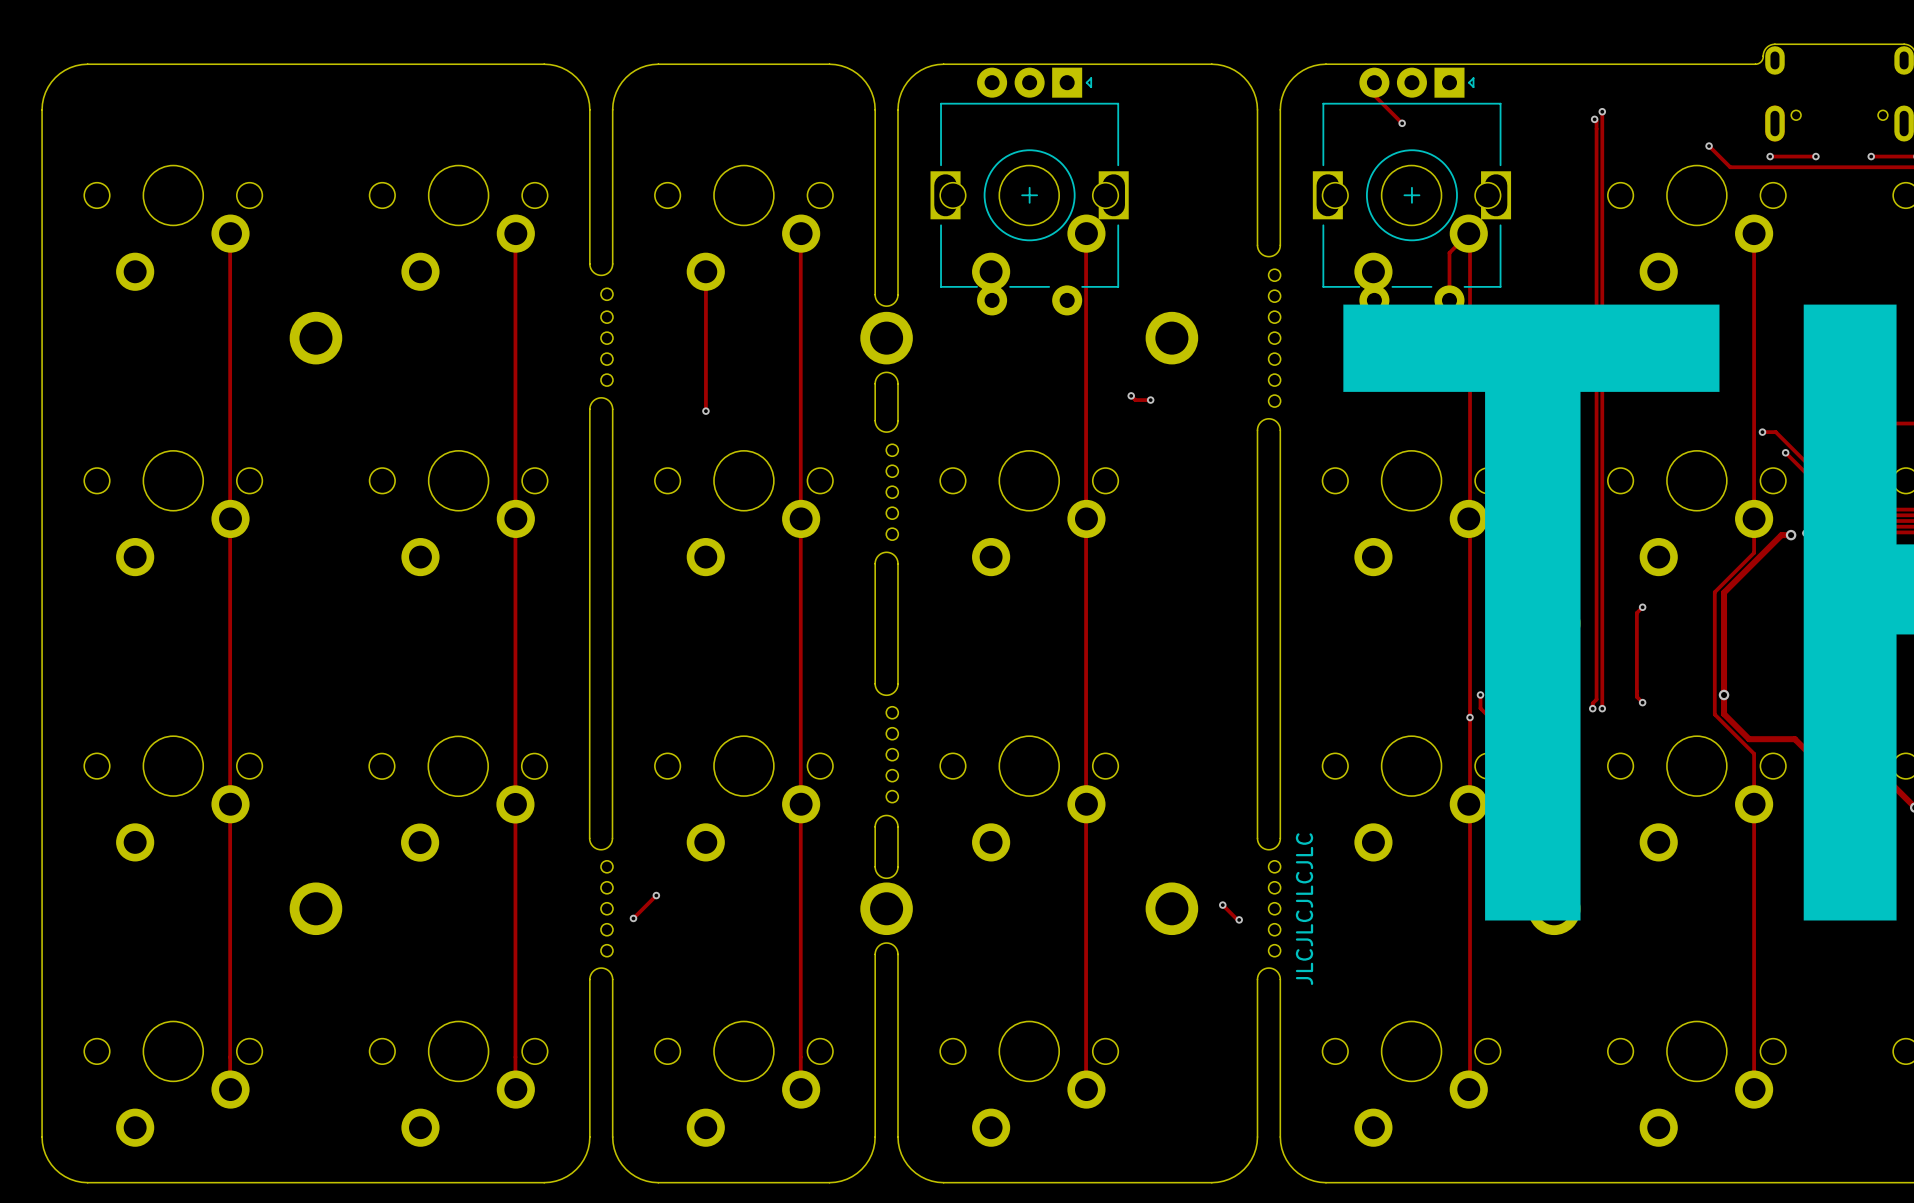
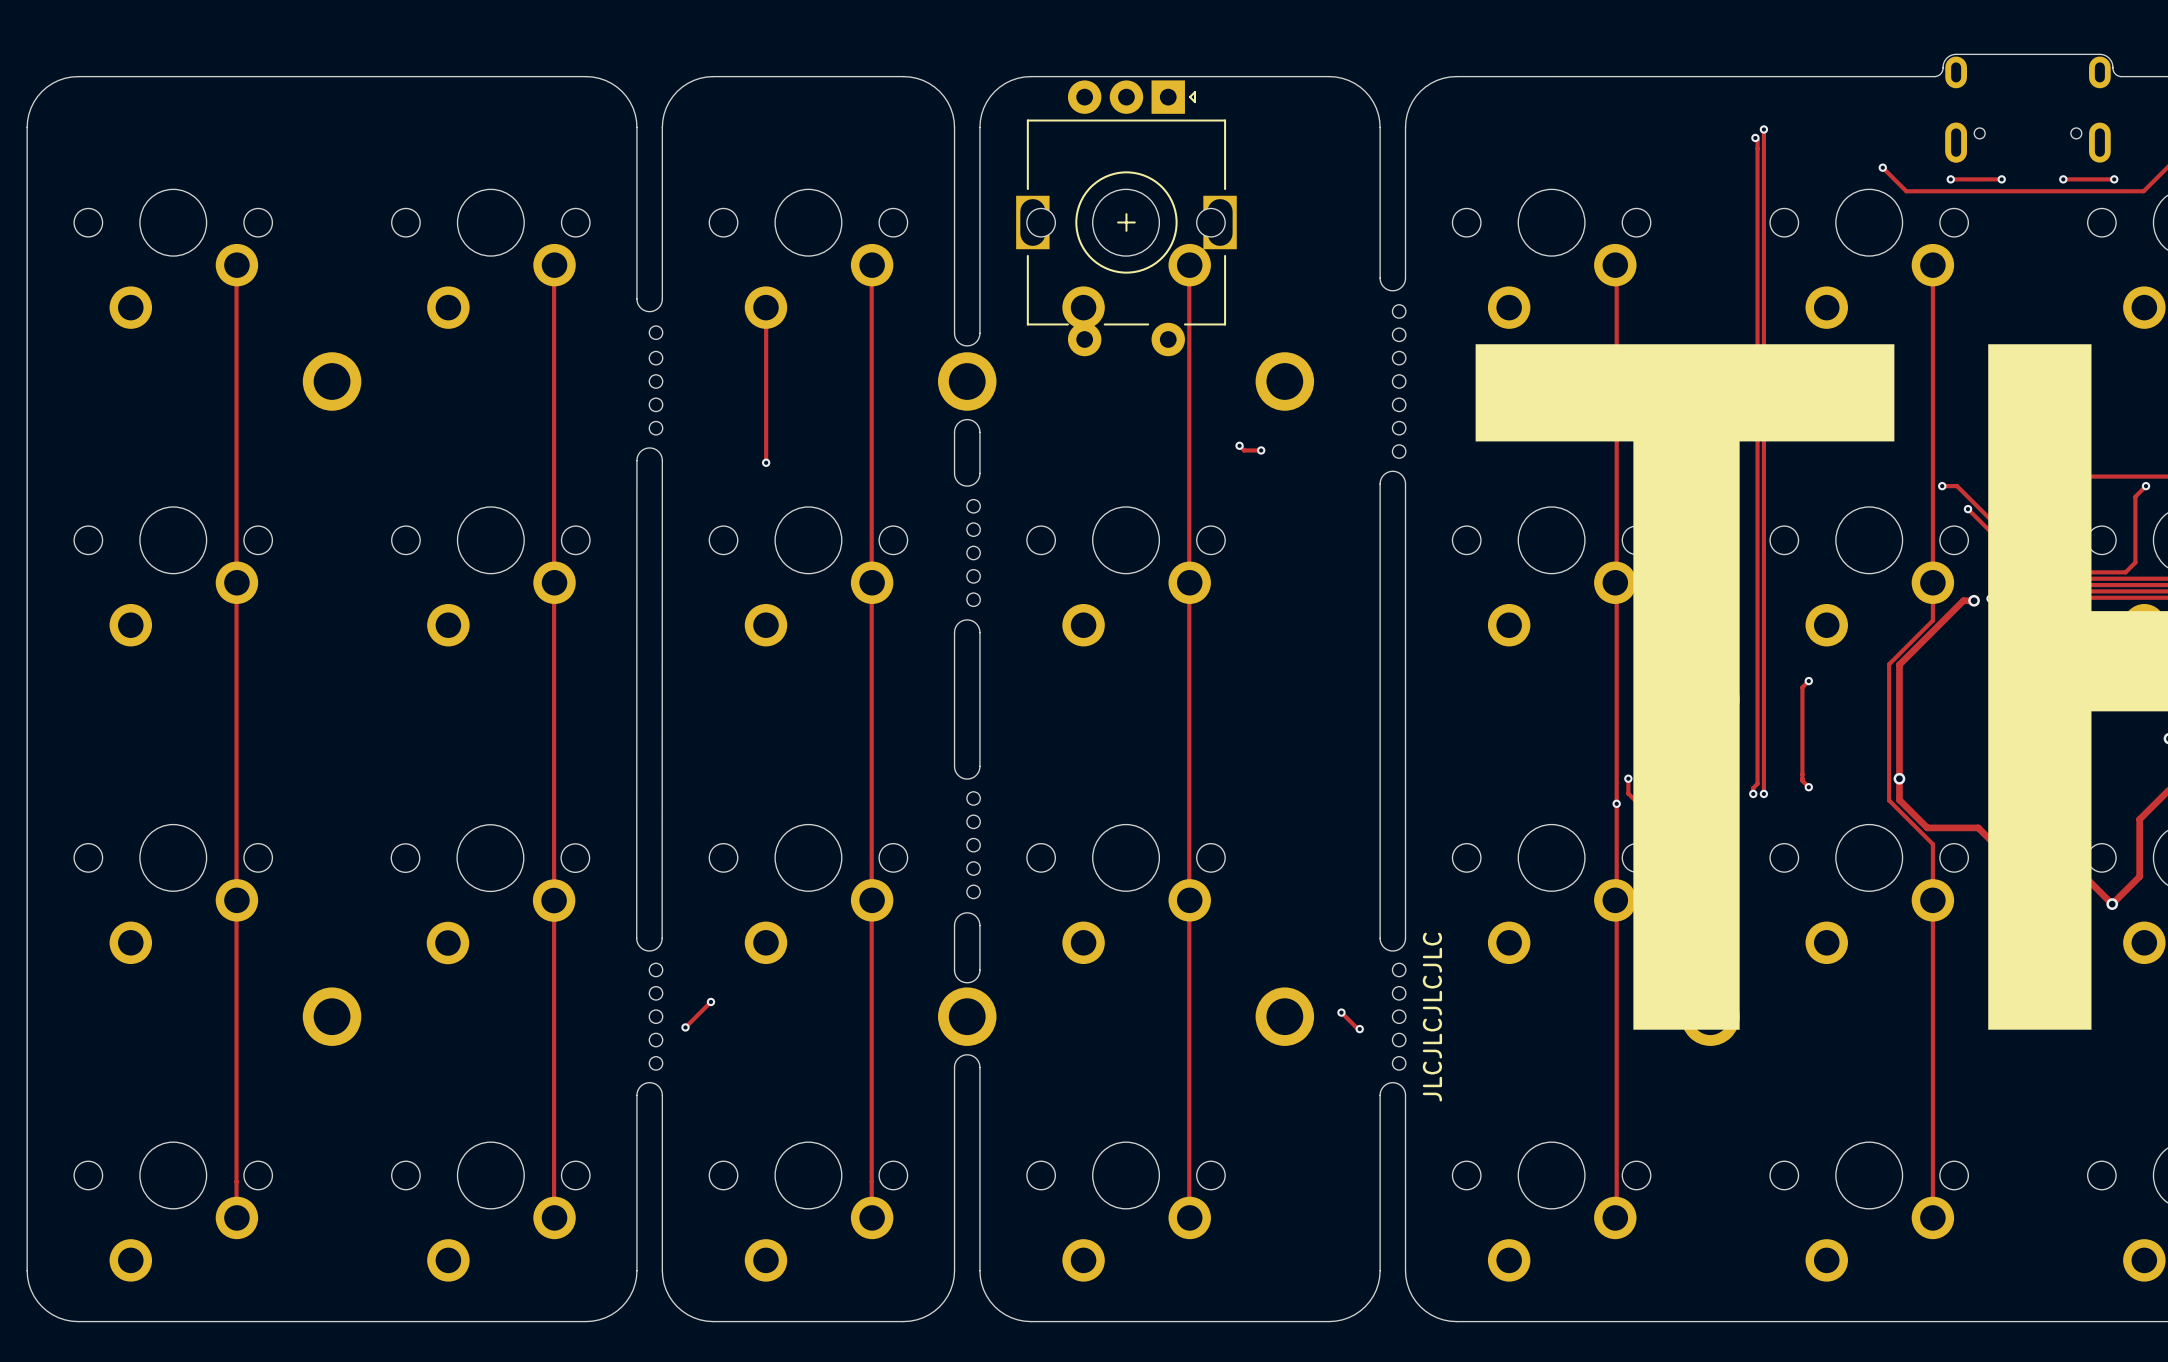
track: (1374, 82) (1374, 95) (1402, 123) -> none
via: (1402, 123) -> none
part: (1411, 191) -> none
track: (1468, 233) (1449, 252) (1449, 300) -> none

